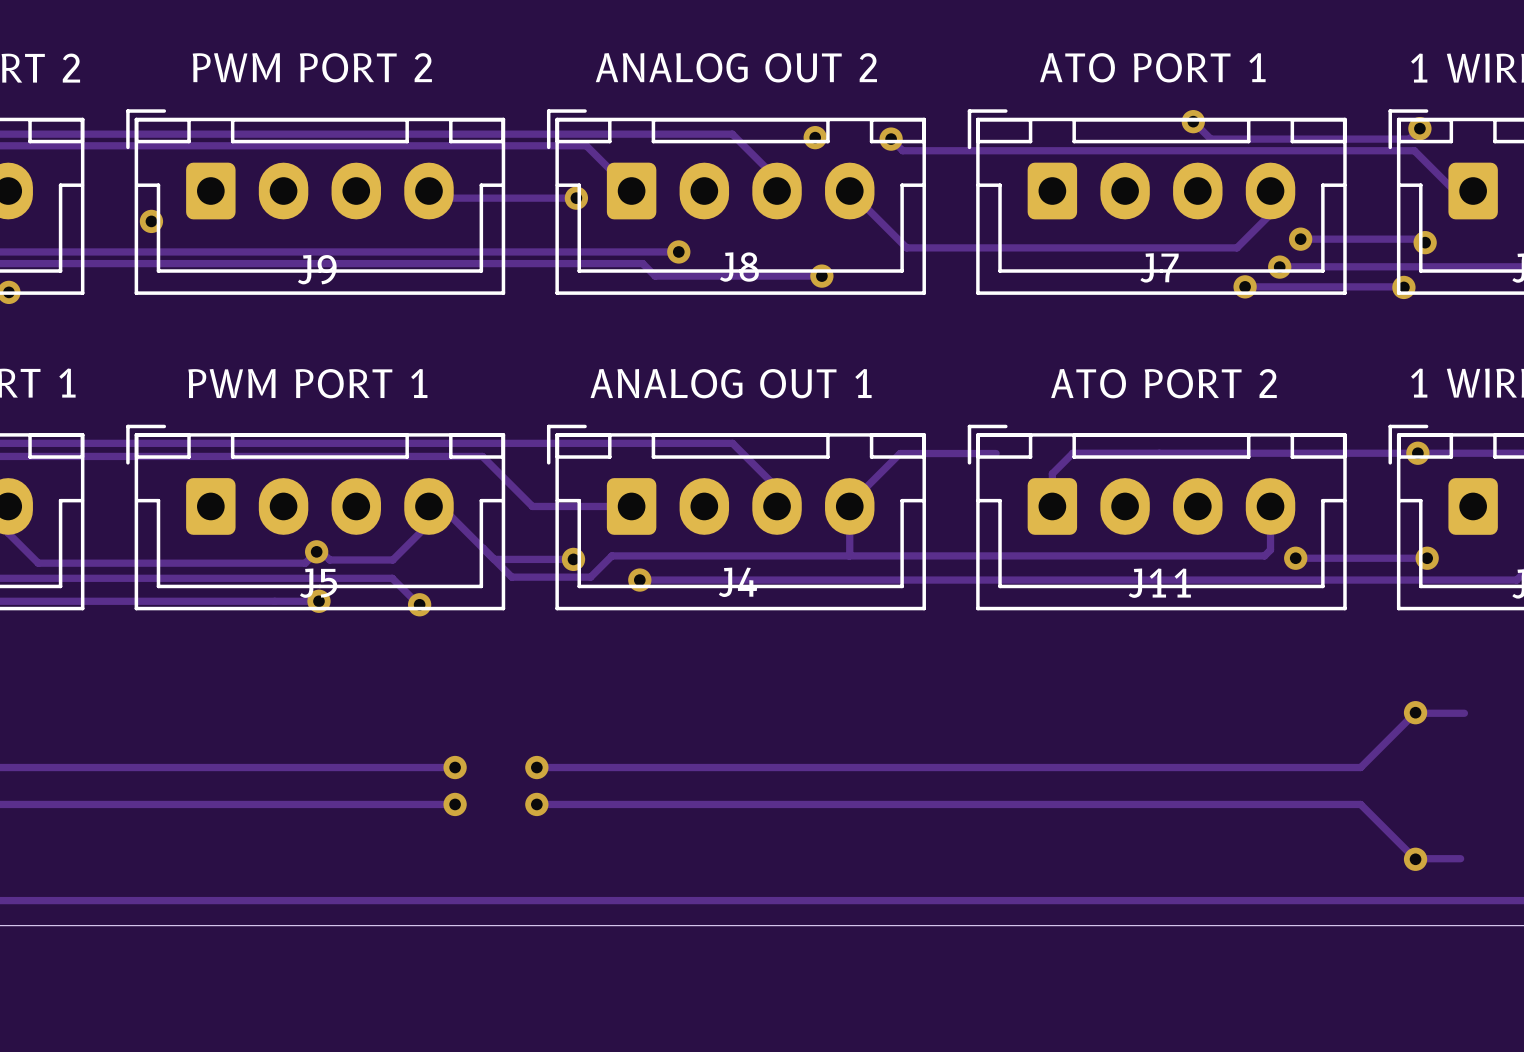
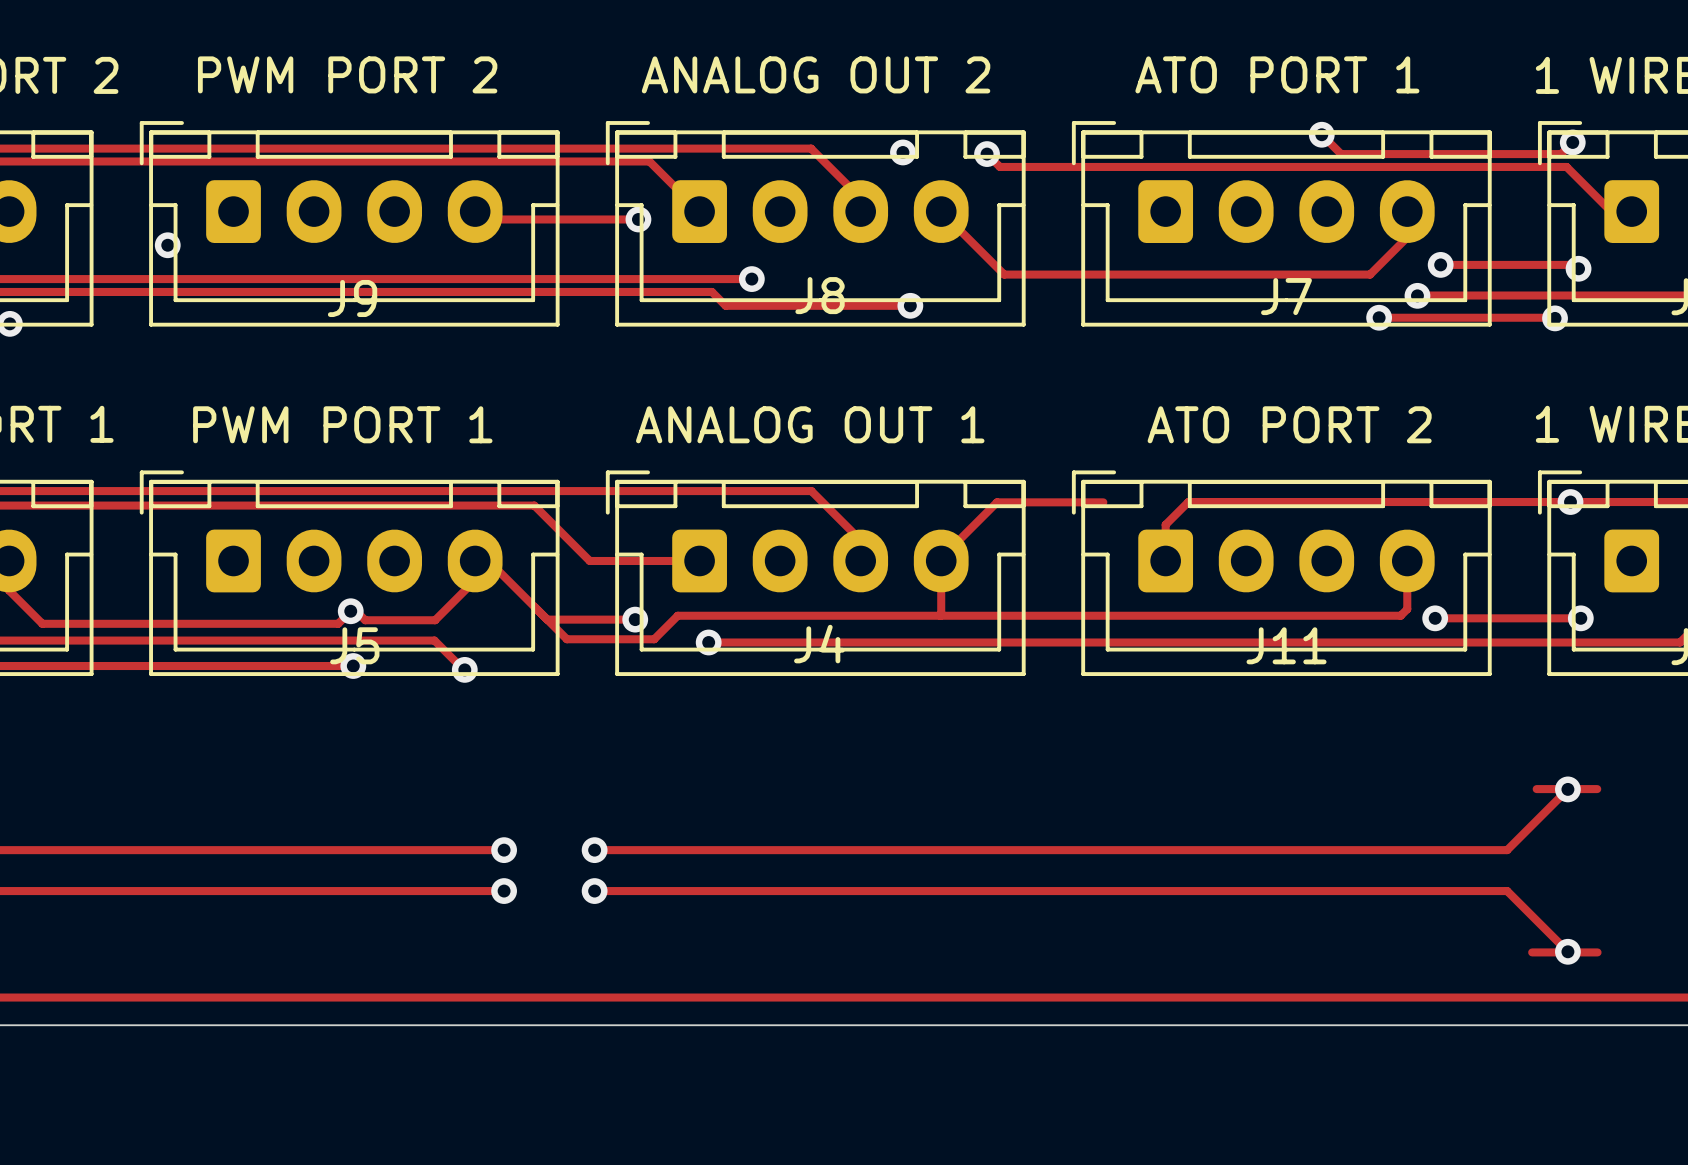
track: none -> (1536, 789) (1597, 789)
track: (1412, 713) (1464, 713) -> none
track: (1416, 858) (1460, 858) -> none
track: none -> (1532, 952) (1597, 952)

